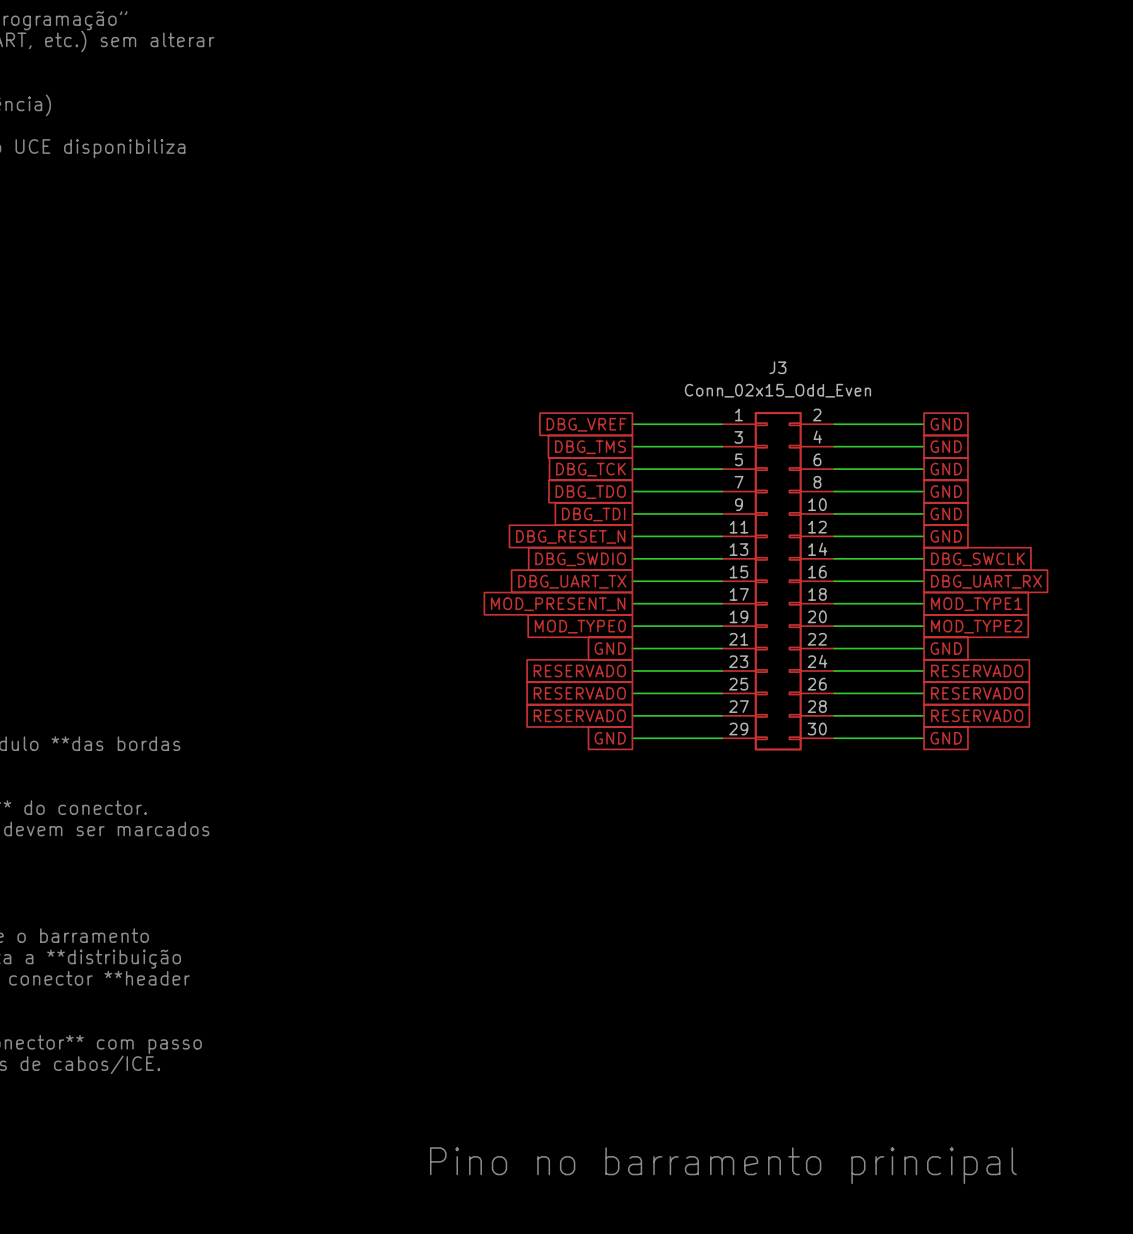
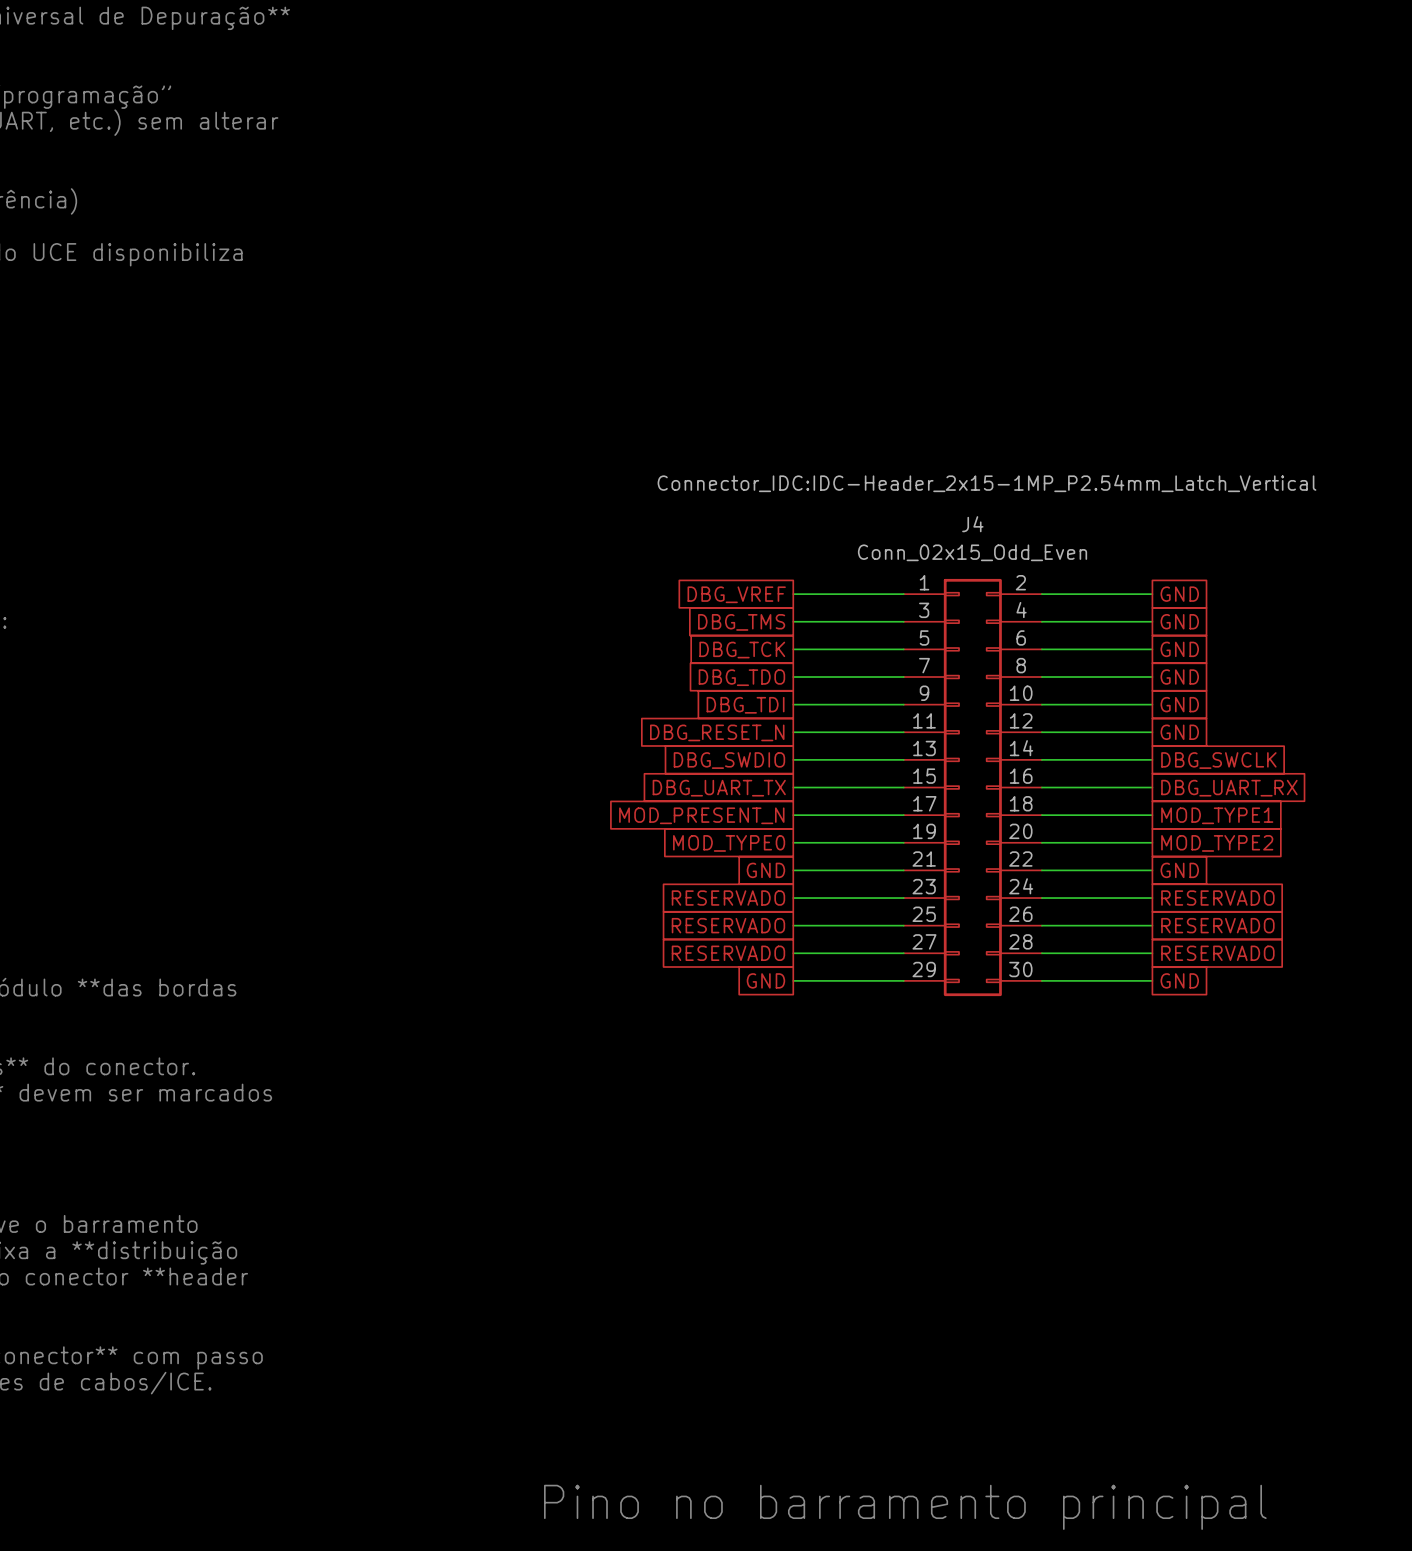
J3 text: none -> Connector_IDC:IDC-Header_2x15-1MP_P2.54mm_Latch_Vertical (986, 483)
J3 name: J3 (777, 367) -> J4 (972, 524)

